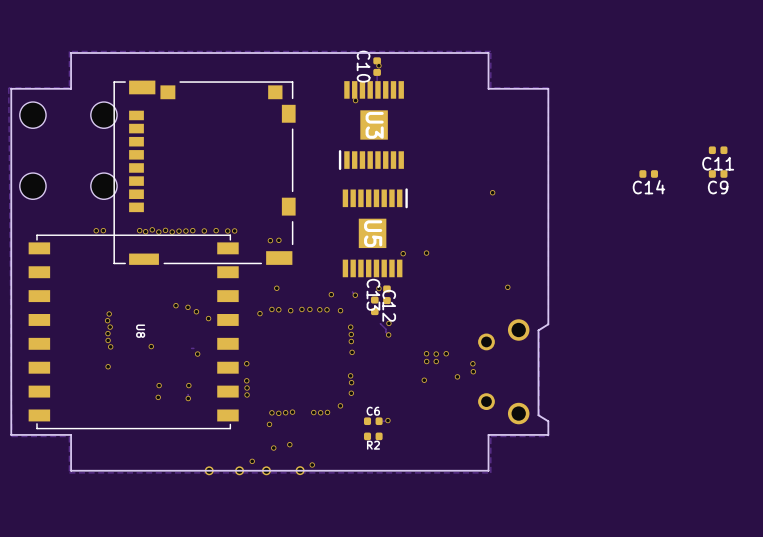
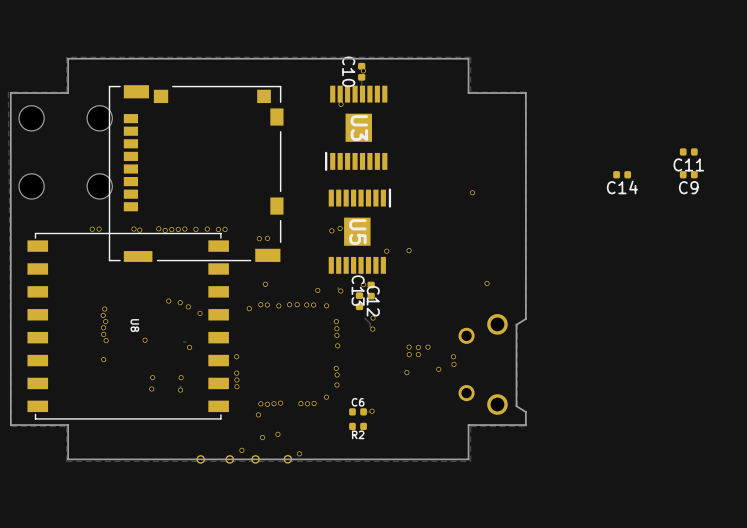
via: (152, 229) -> none
via: none -> (340, 228)
via: (158, 232) -> none
via: none -> (331, 230)

